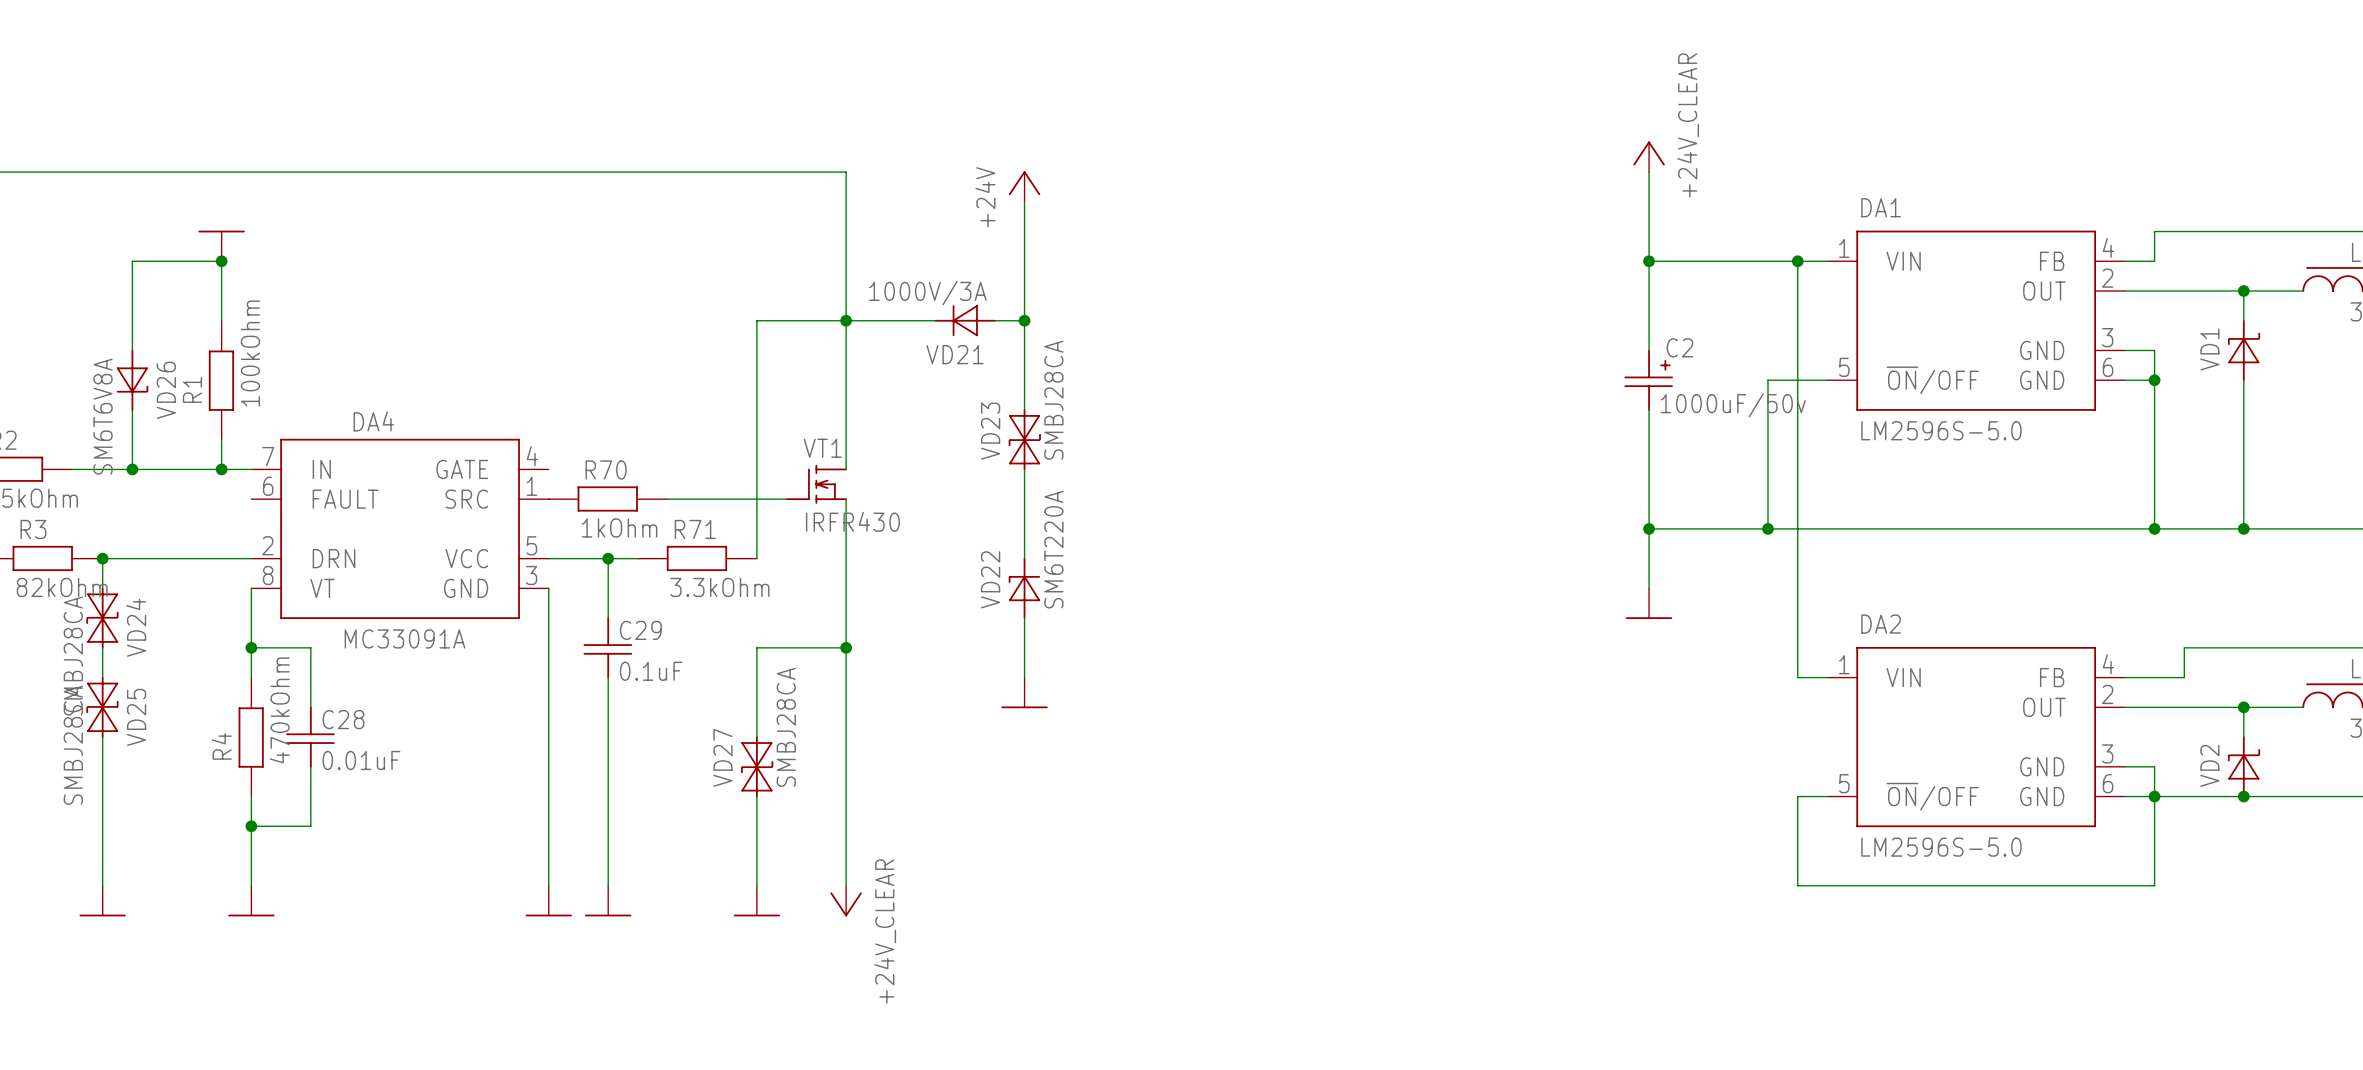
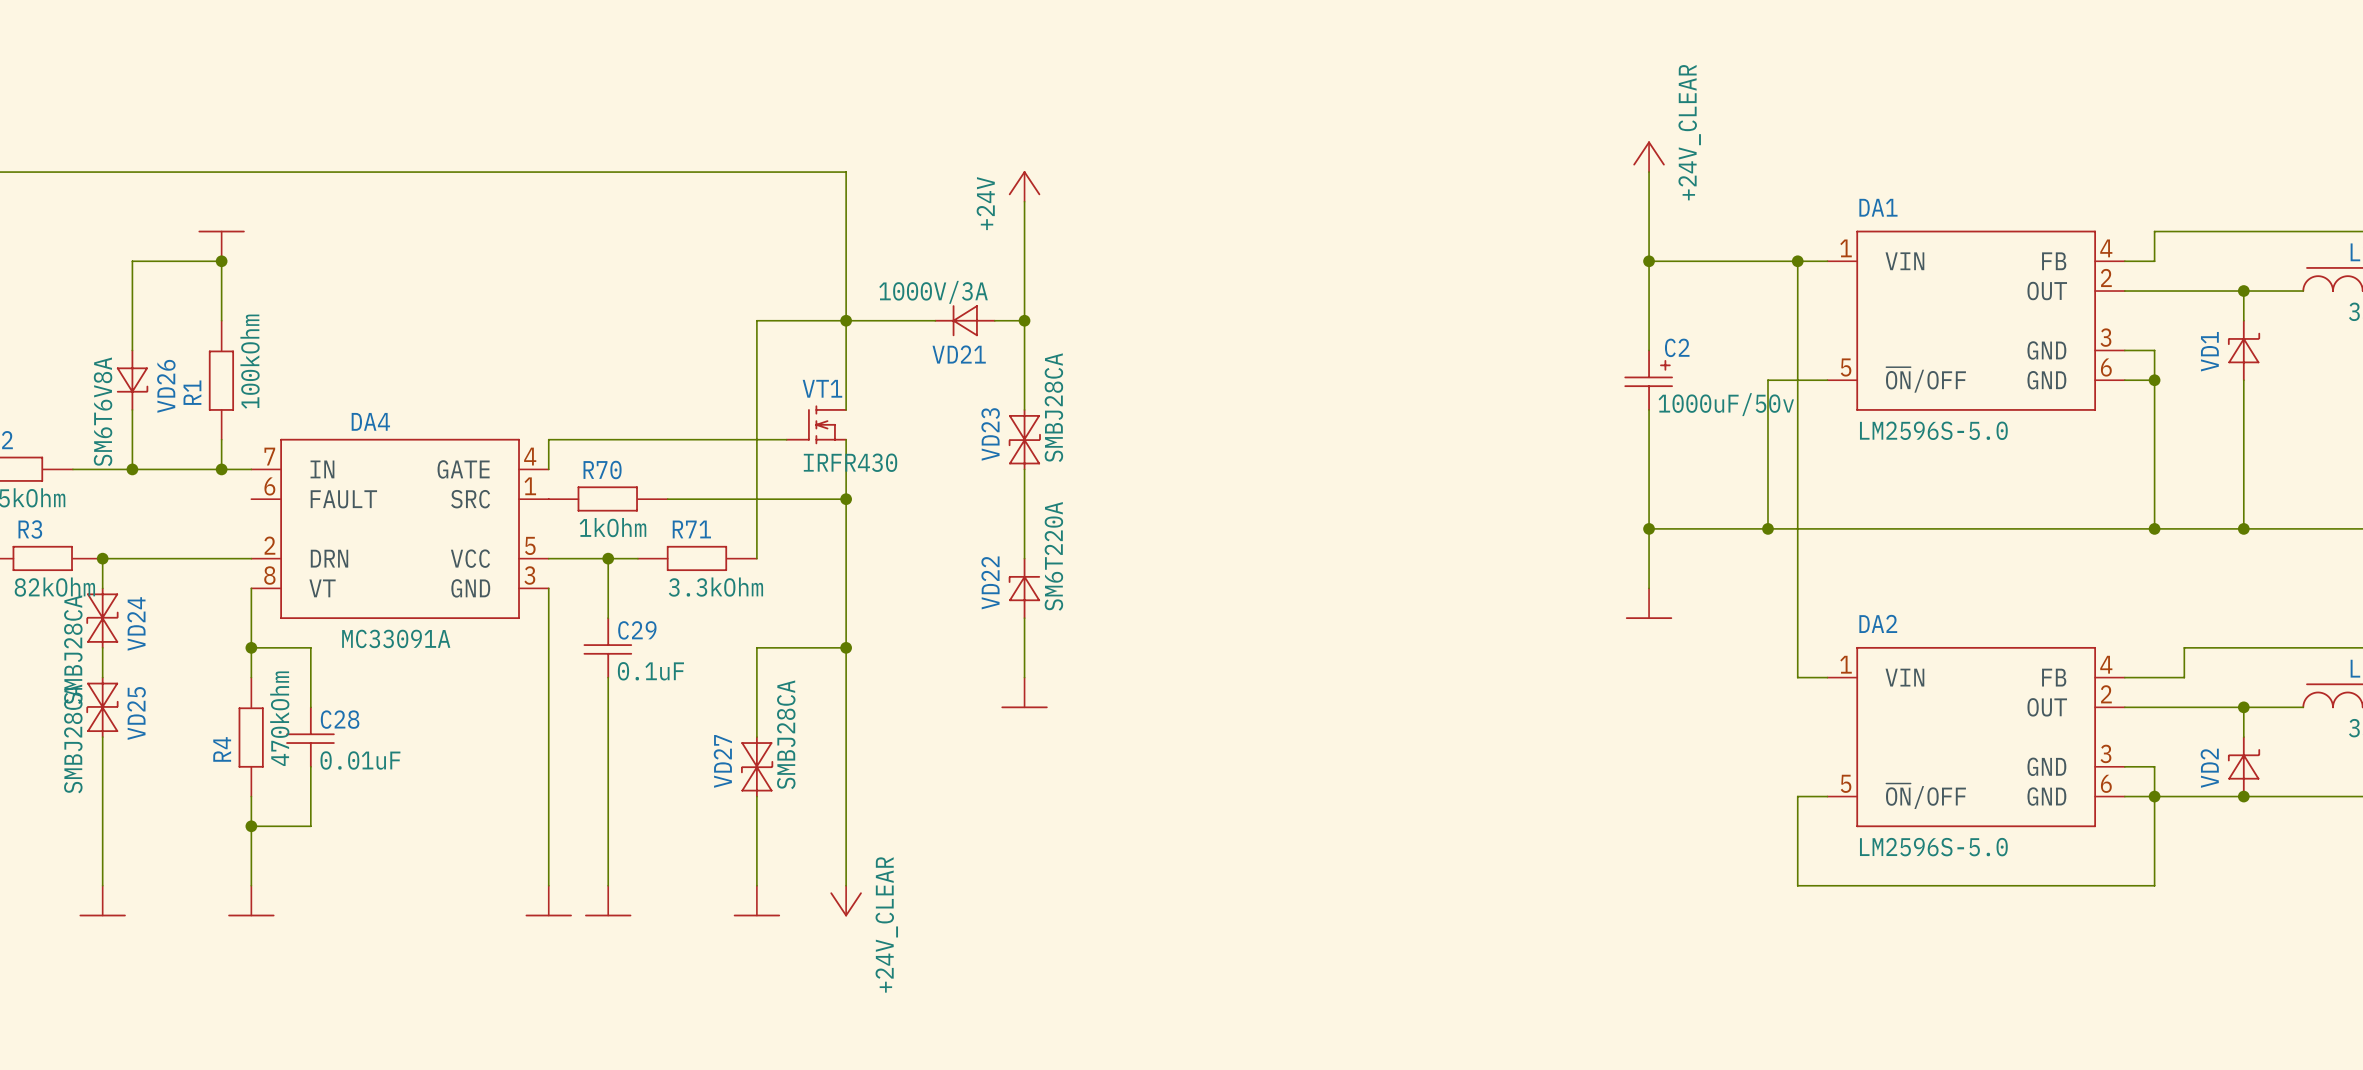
wire: (846, 409) (846, 439) -> none
wire: none -> (786, 439) (548, 439) (548, 469)
wire: none -> (846, 469) (846, 499) (786, 499)
VT1 position: (816, 484) -> (816, 424)
junction: none -> (846, 499)

